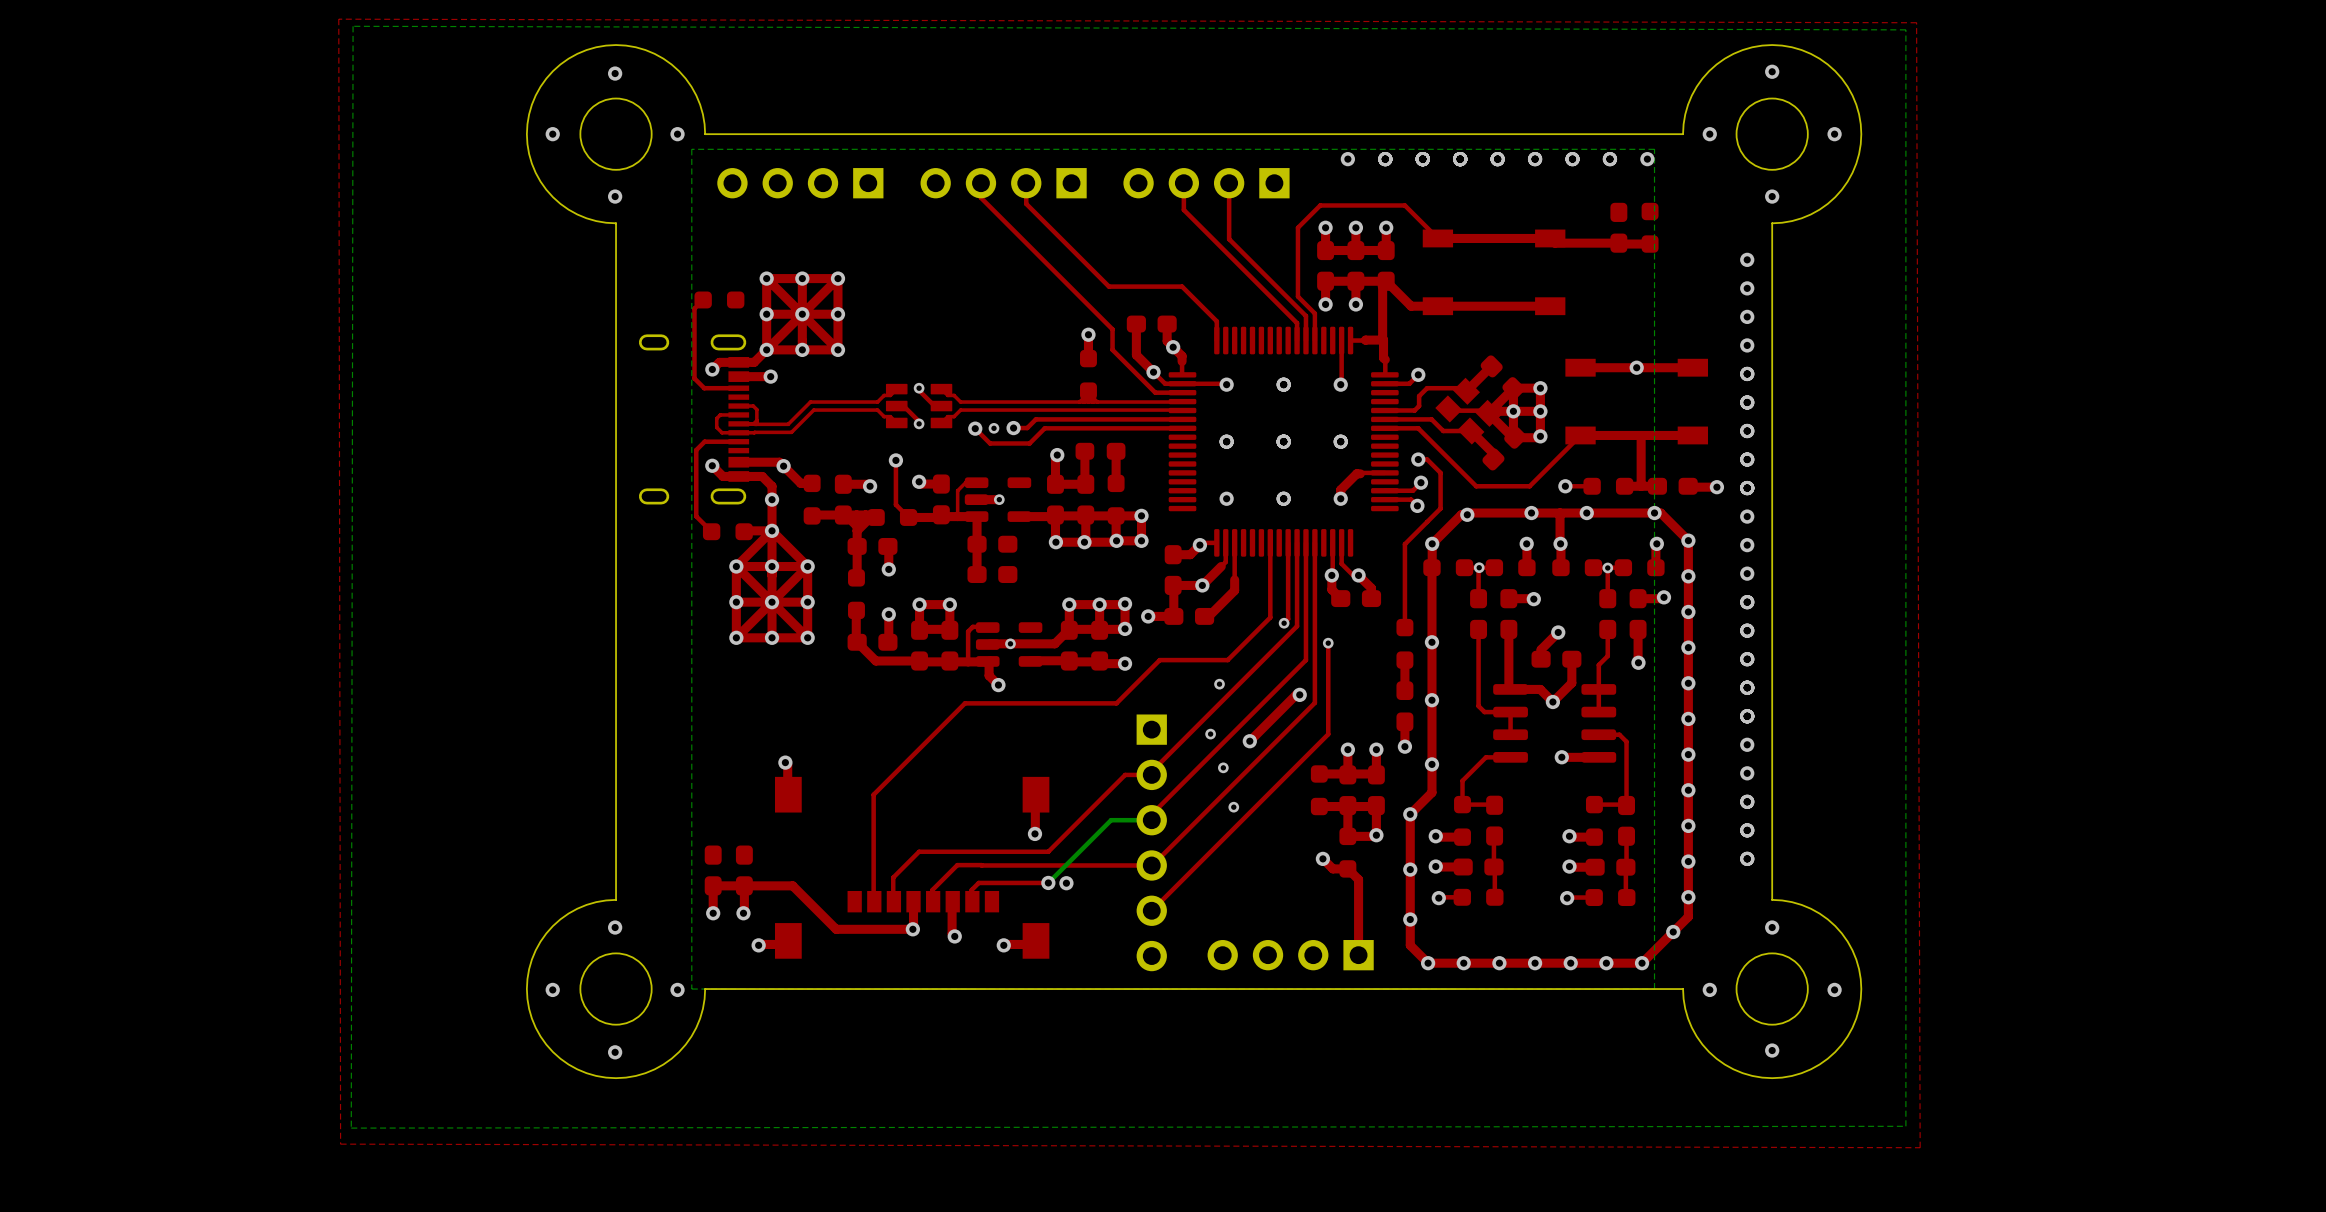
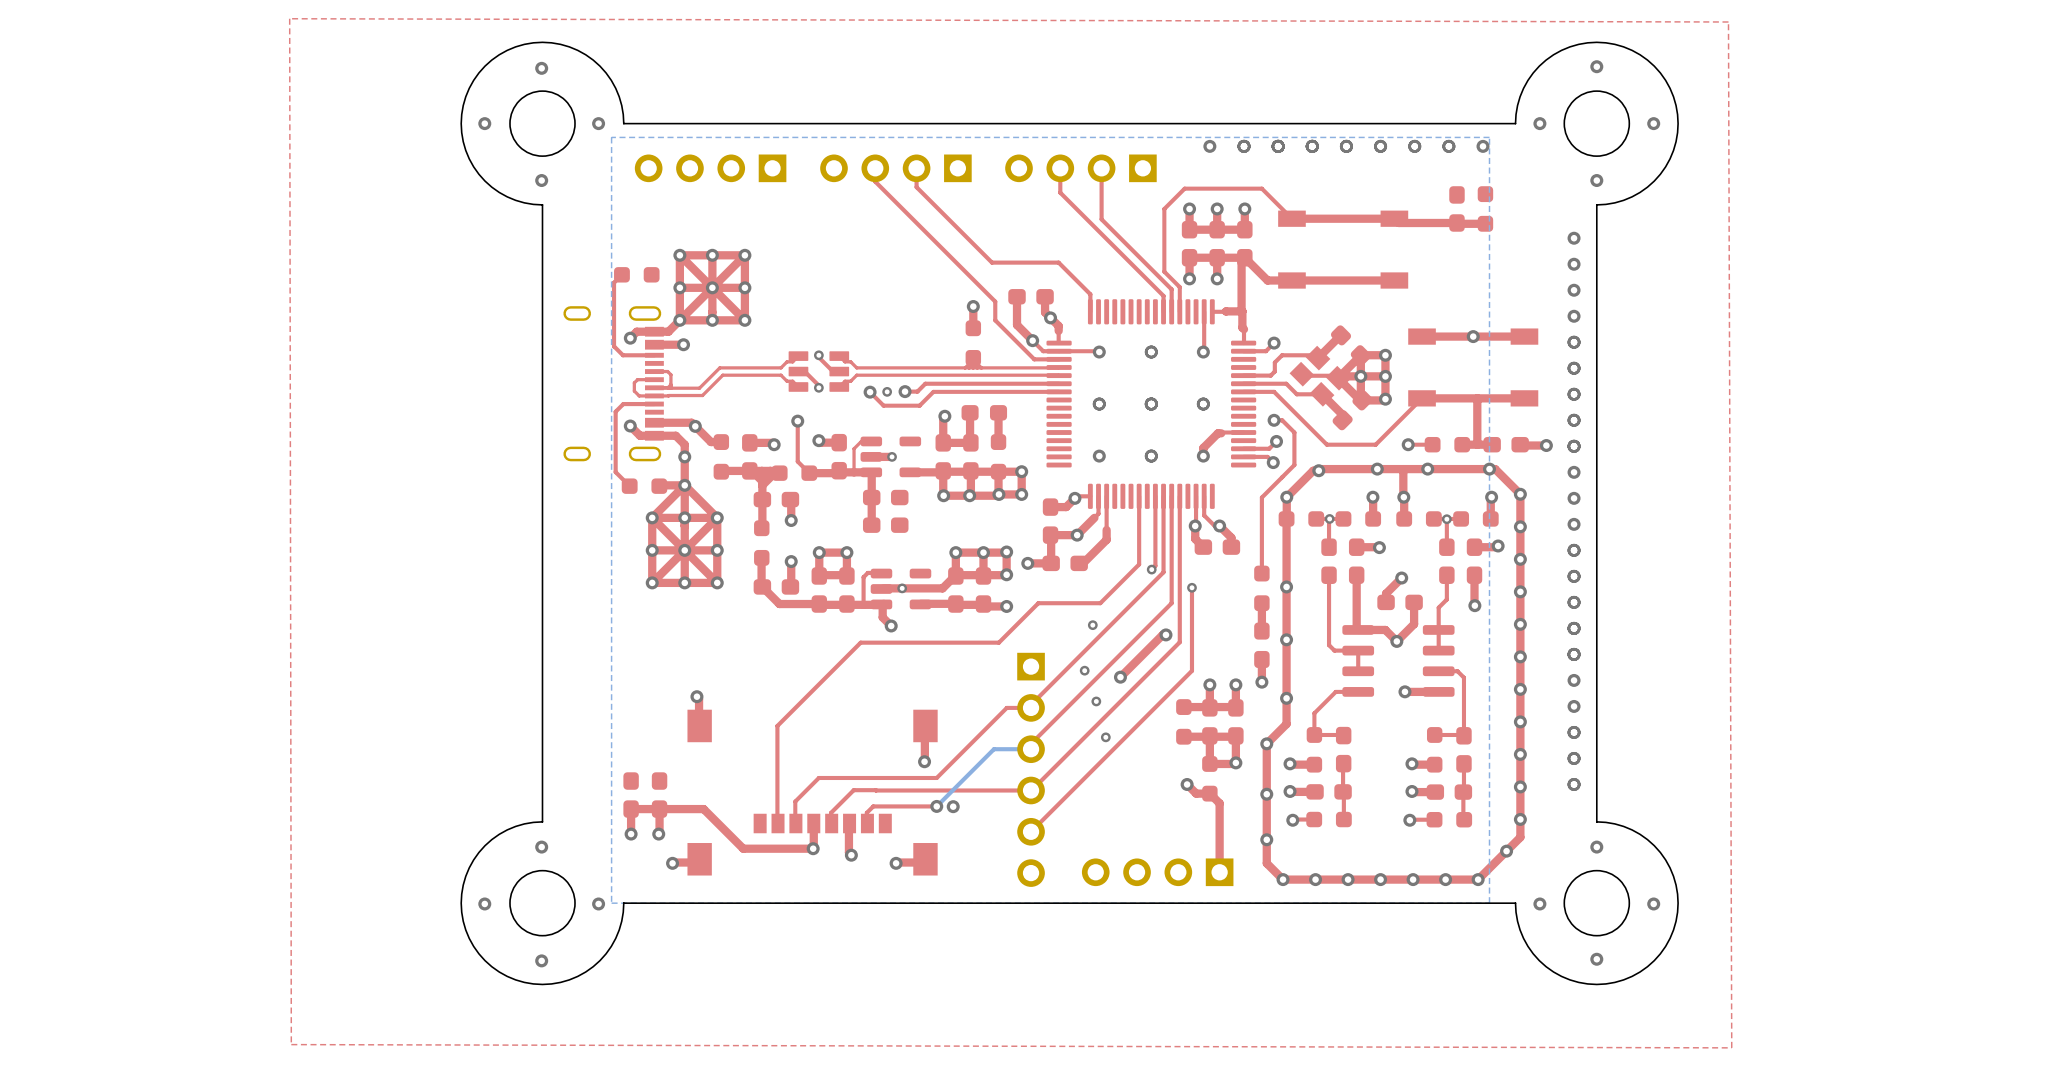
bottom zone outline: (353, 26) (1905, 29) (1905, 1126) (351, 1128) (353, 26) -> none

